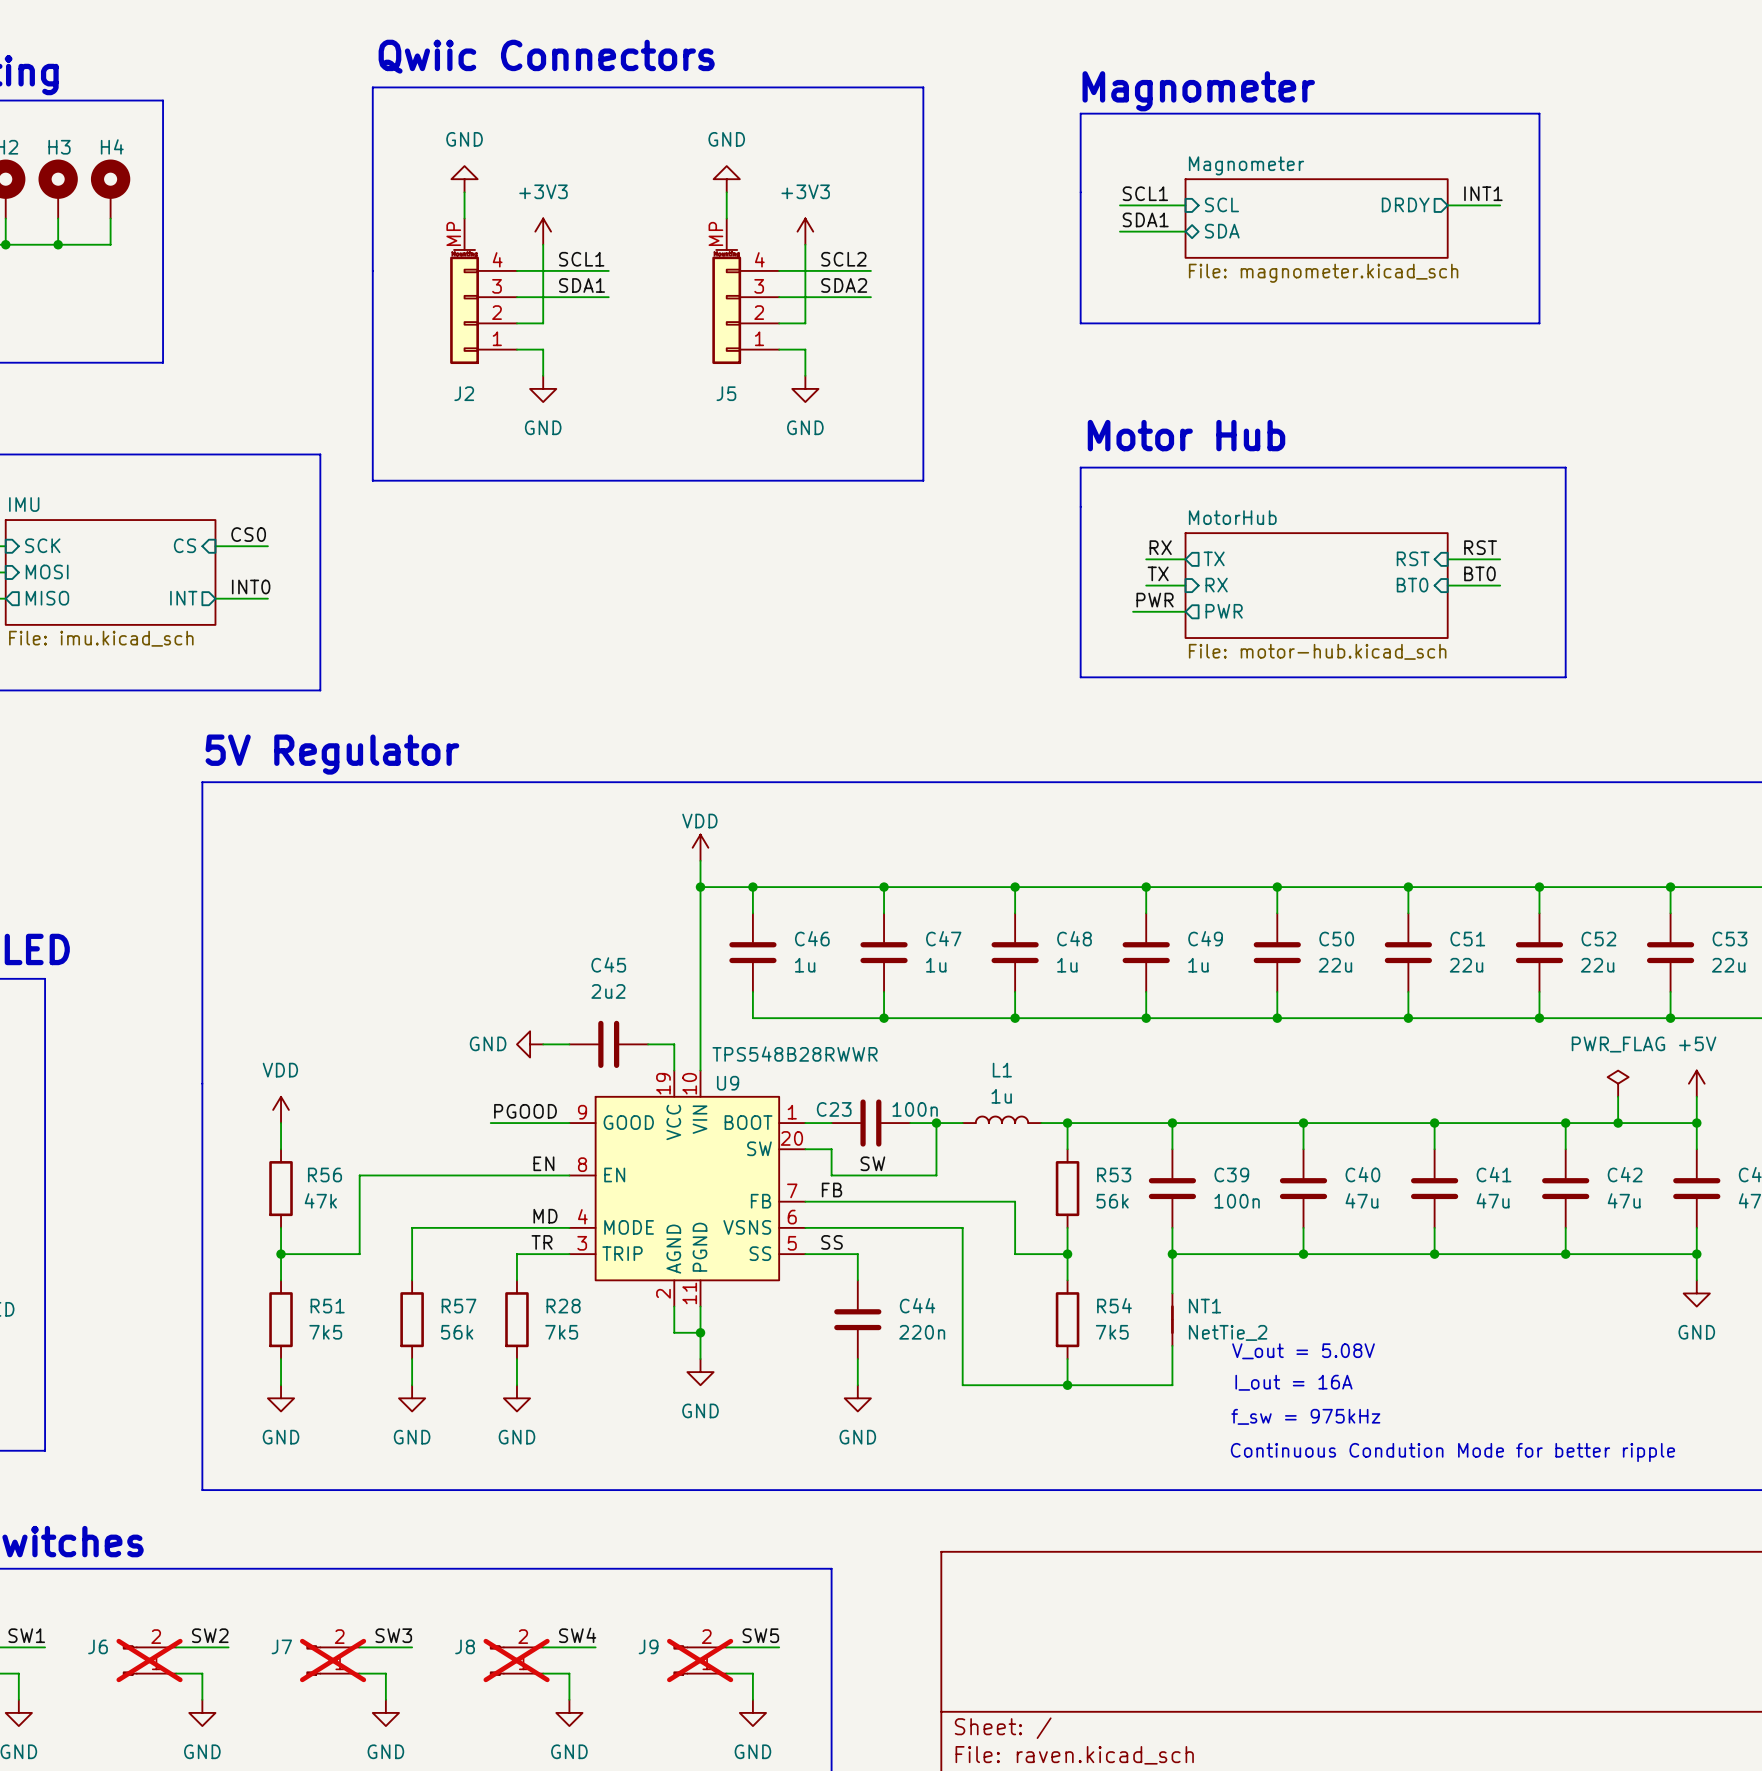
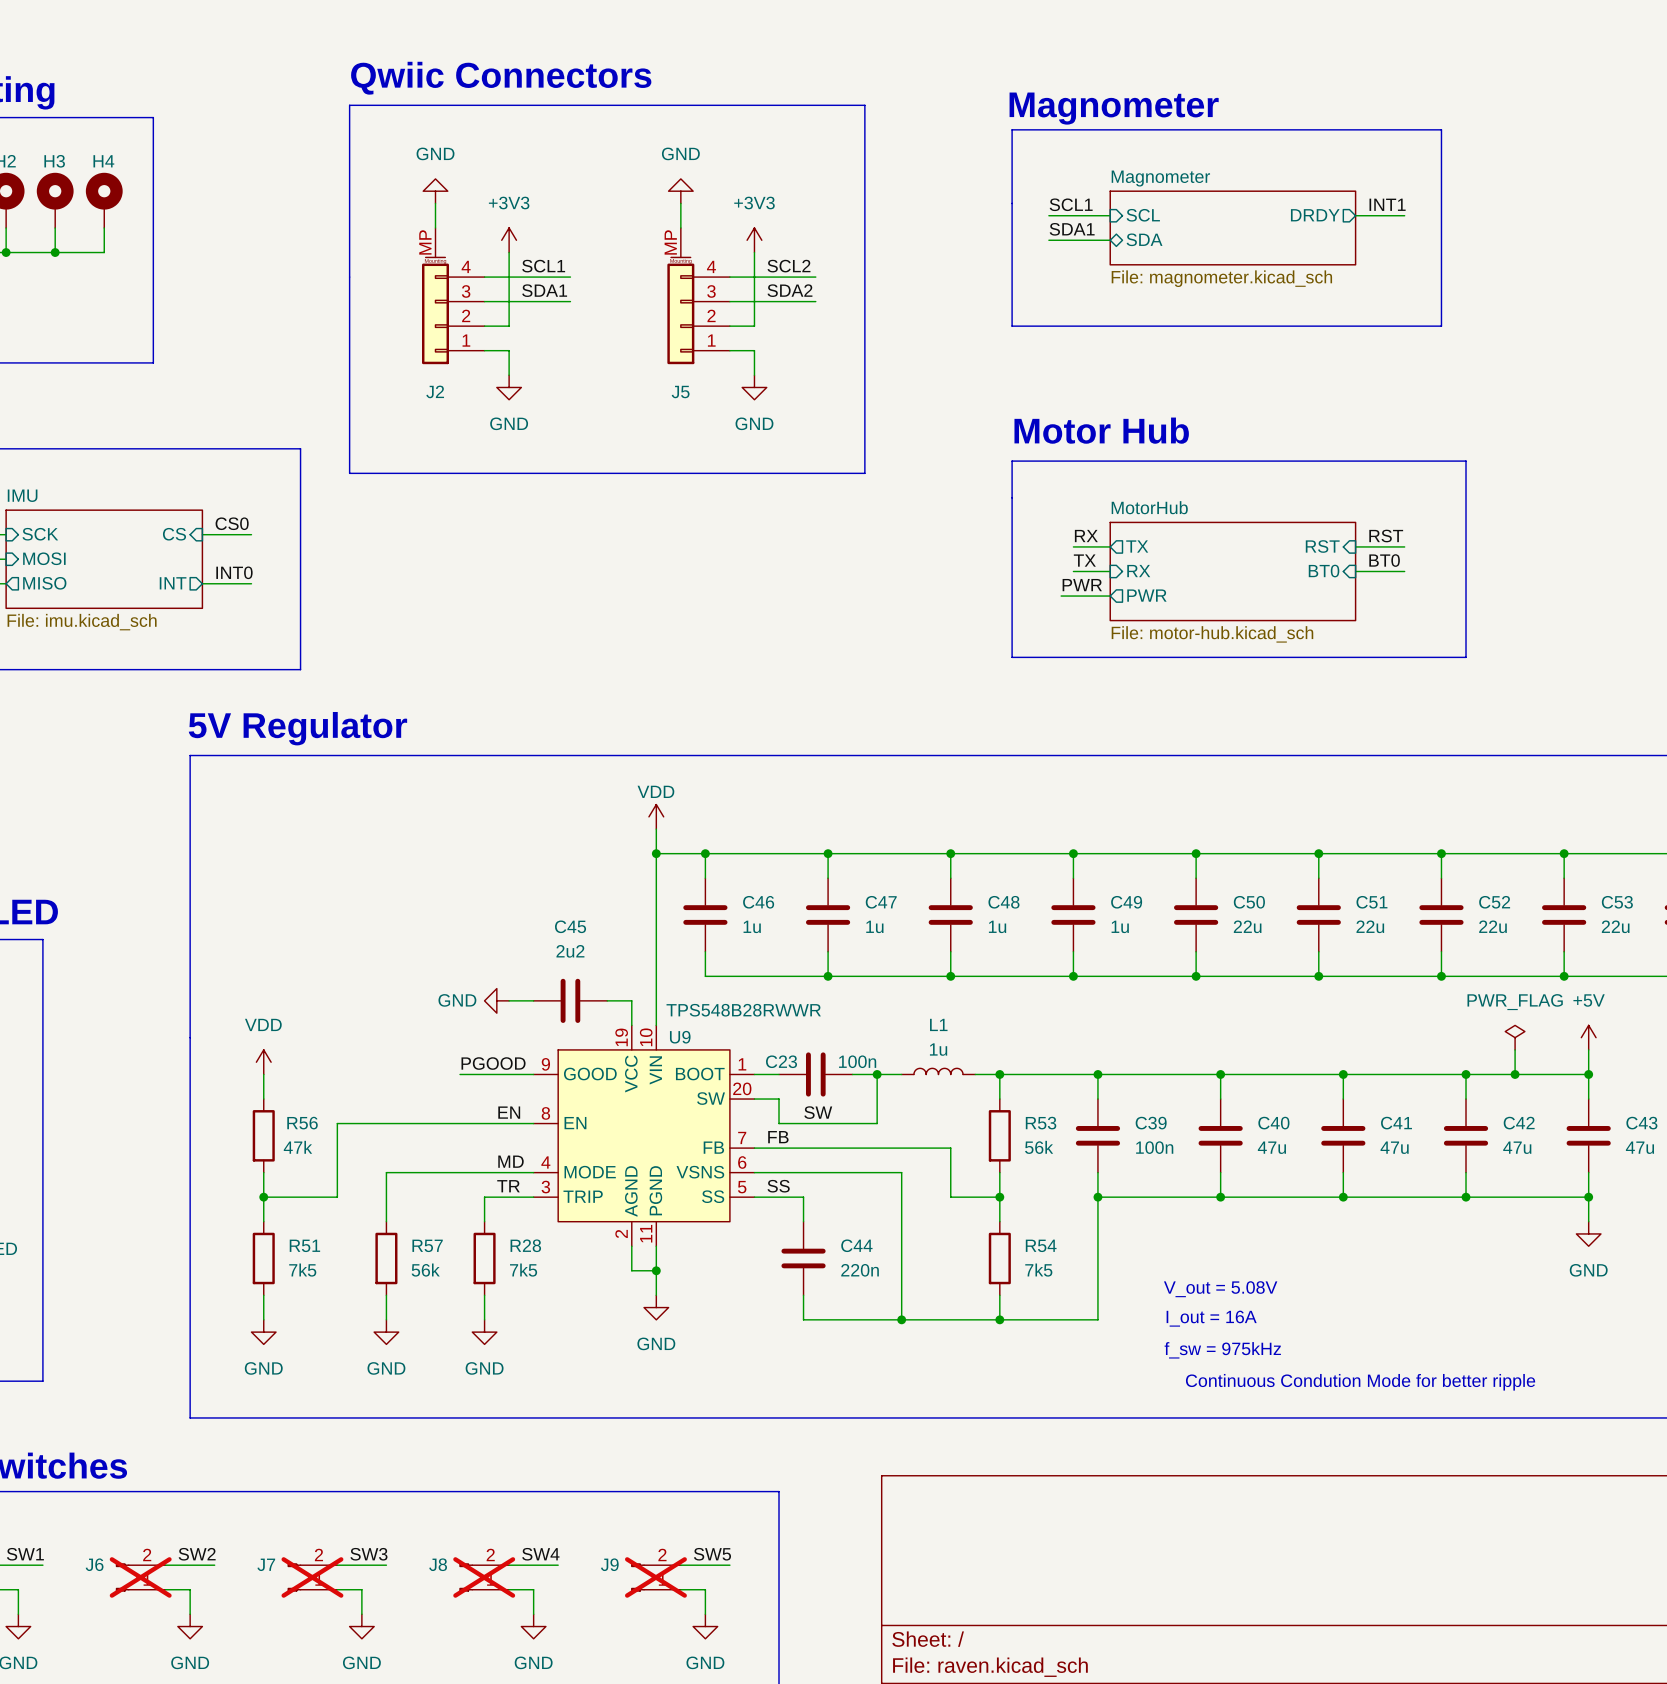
NT1: NetTie_2 (1172, 1319) -> none
wire: none -> (803, 1319) (901, 1319)
junction: none -> (901, 1319)
power symbol: GND (857, 1398) -> none

